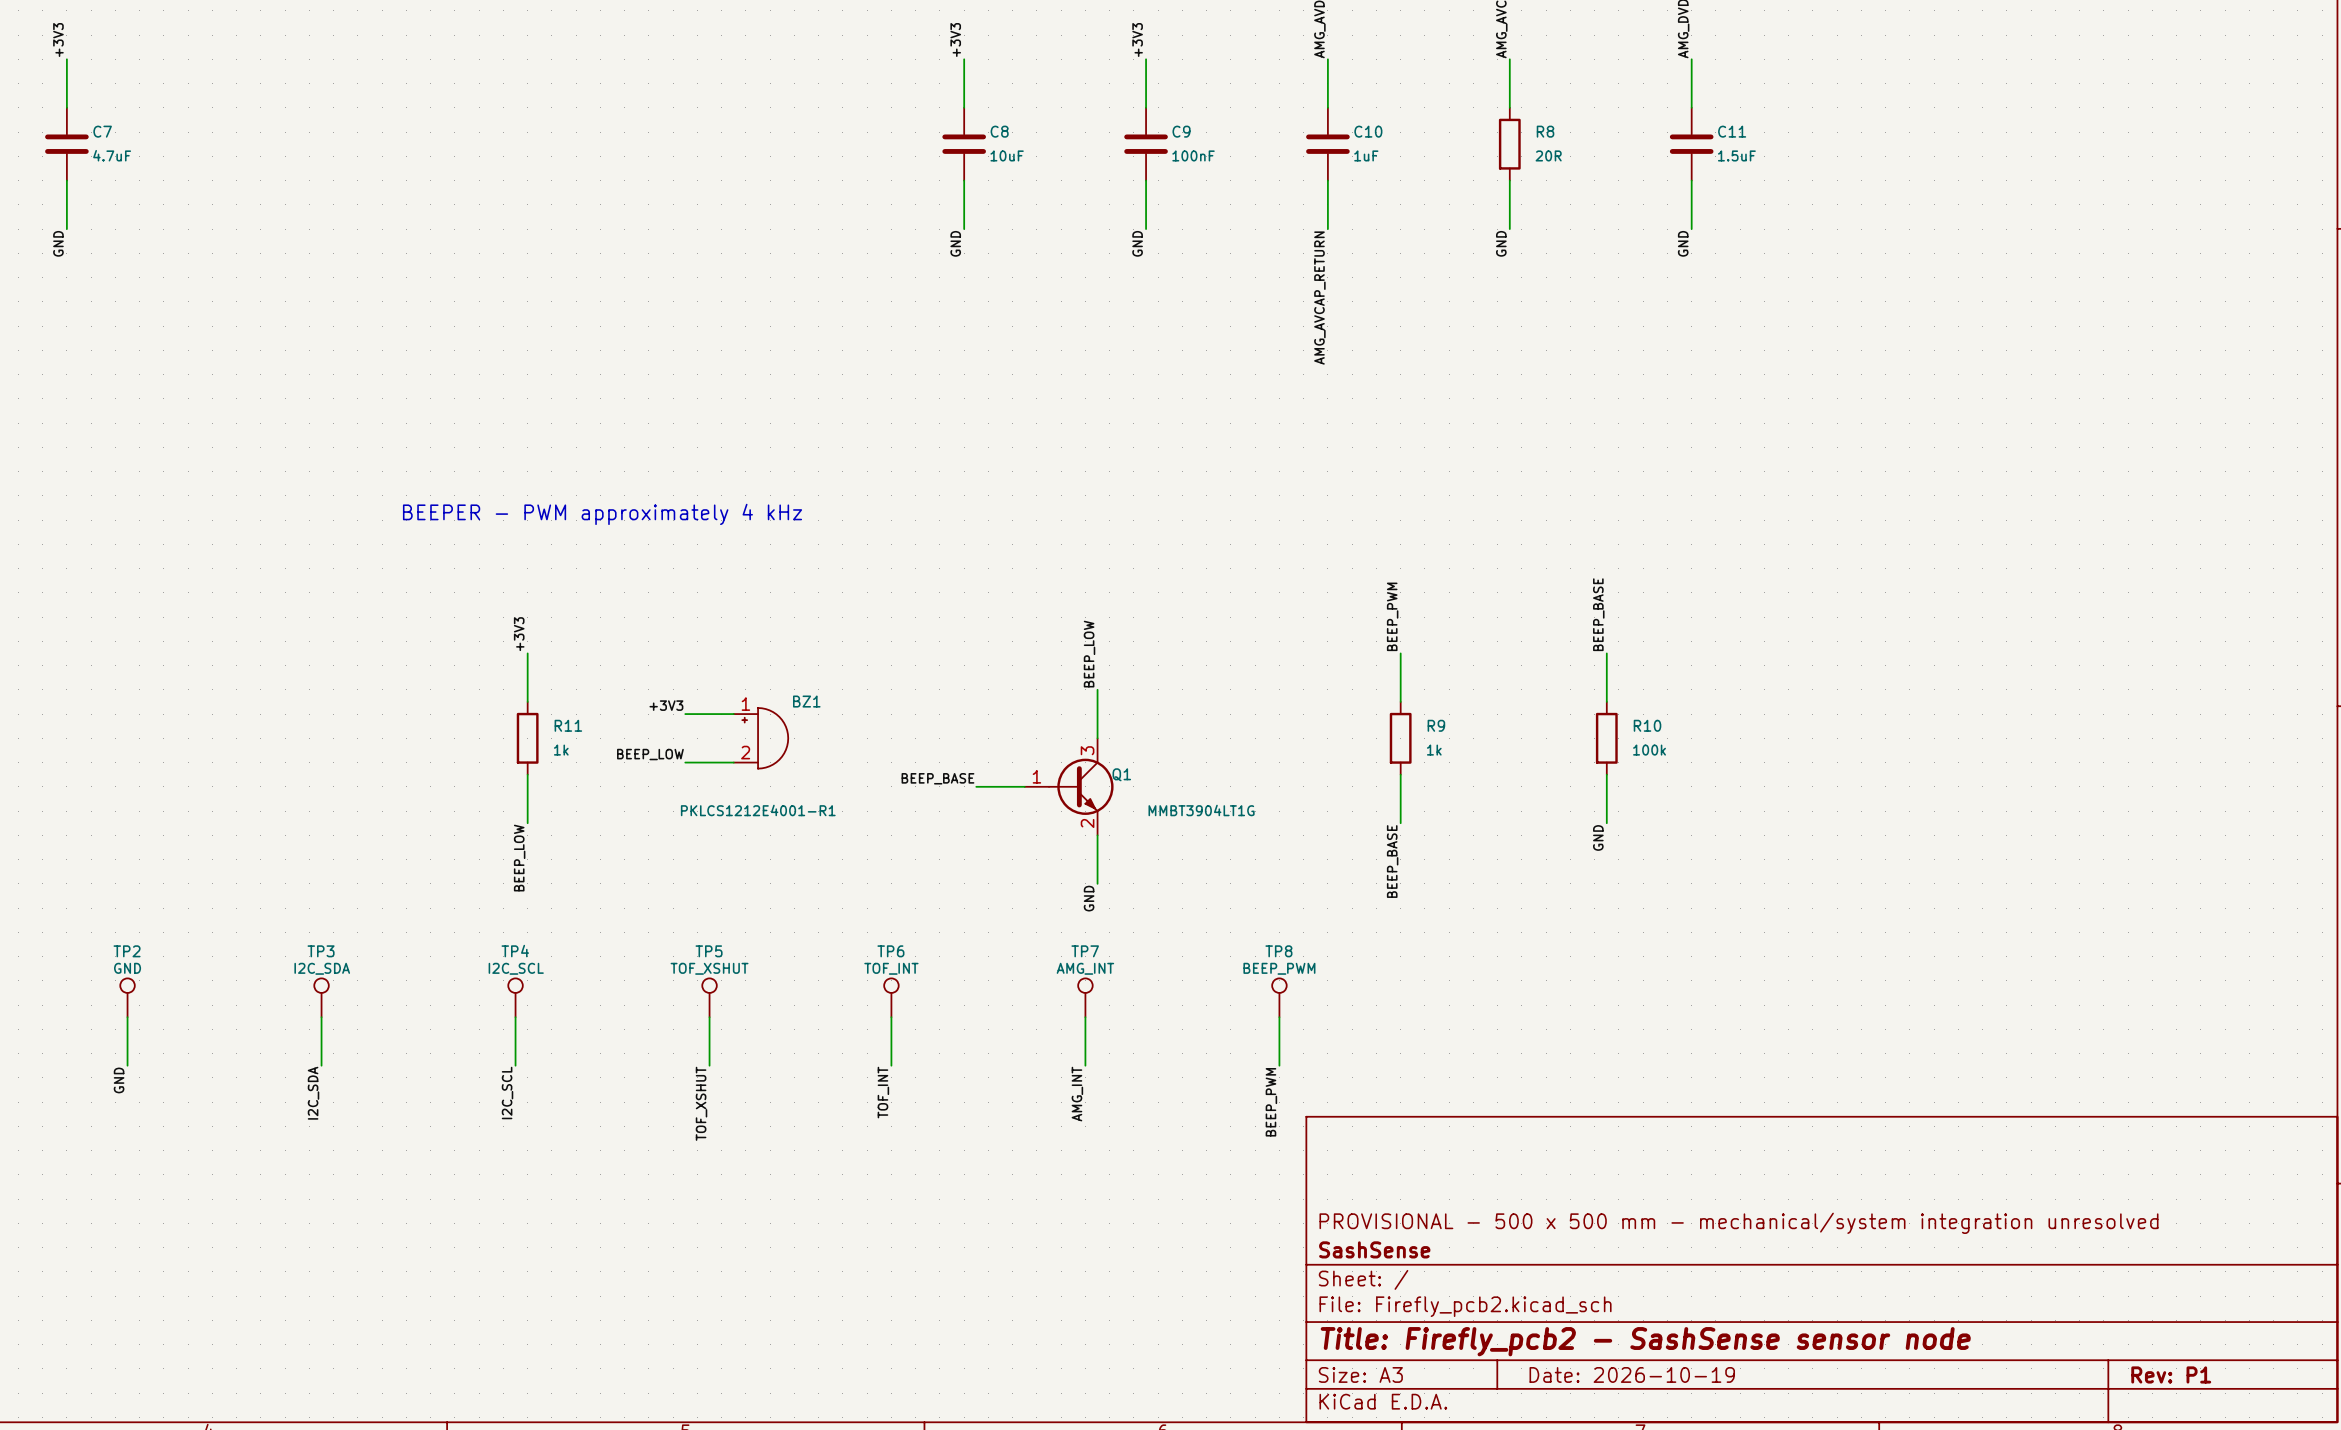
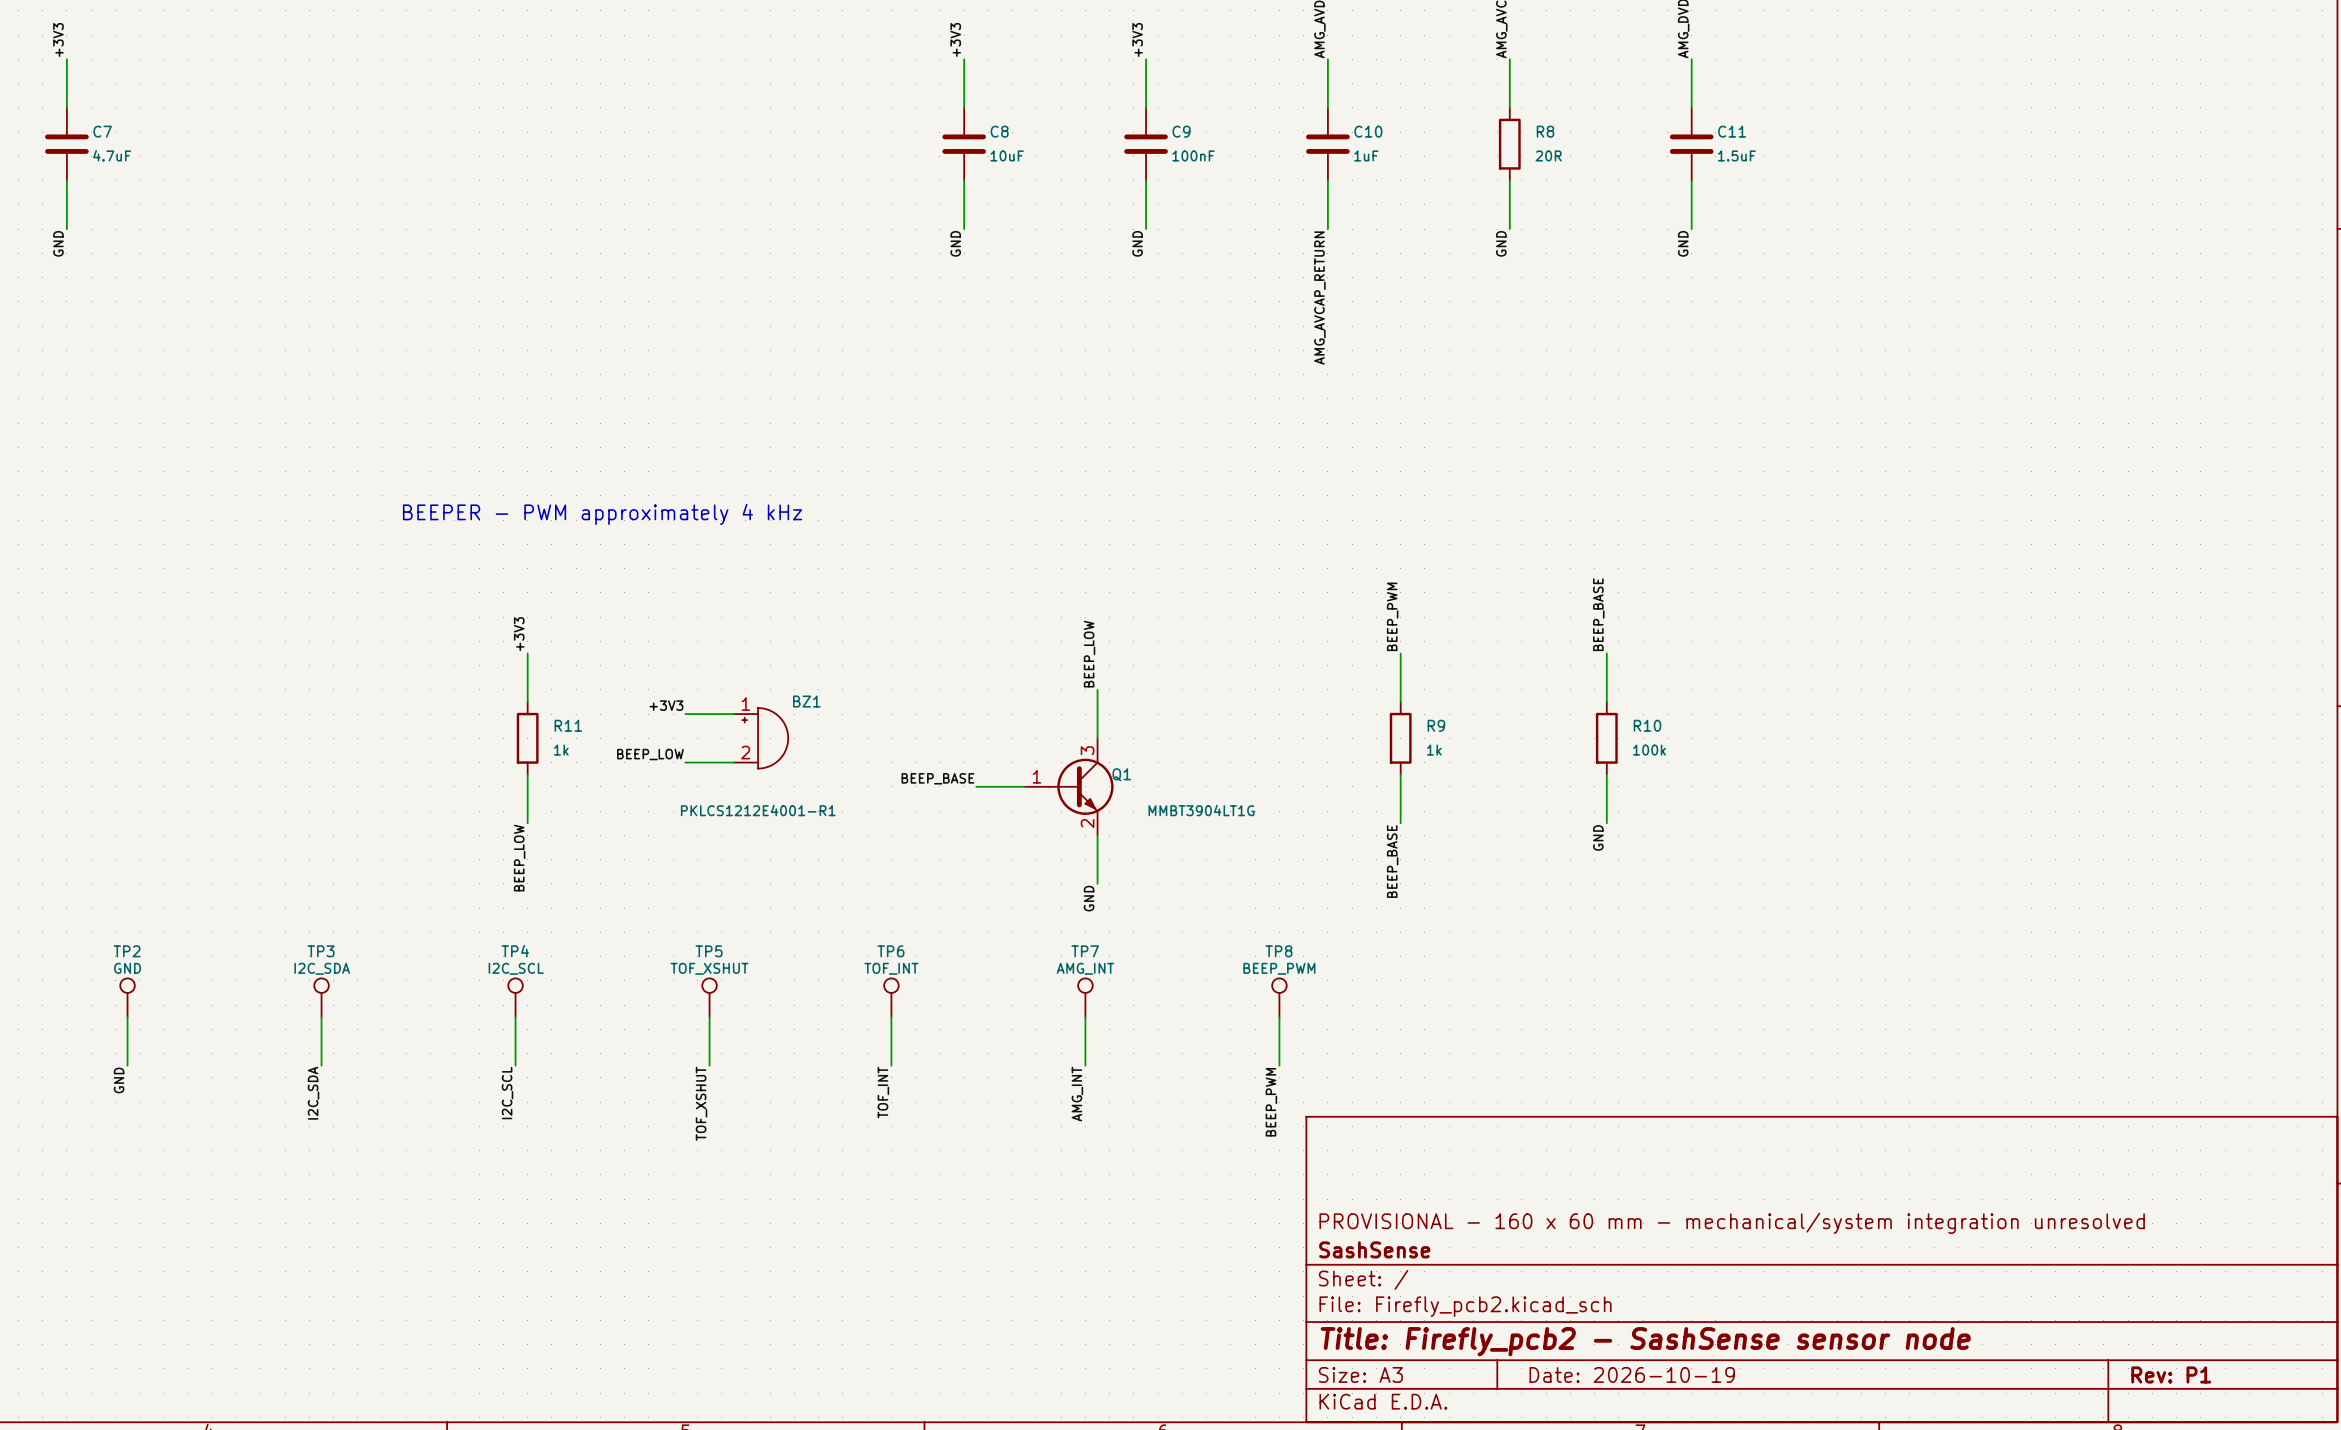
title block: PROVISIONAL - 500 x 500 mm - mechanical/system integration unresolved (1738, 1223) -> PROVISIONAL - 160 x 60 mm - mechanical/system integration unresolved (1732, 1223)

